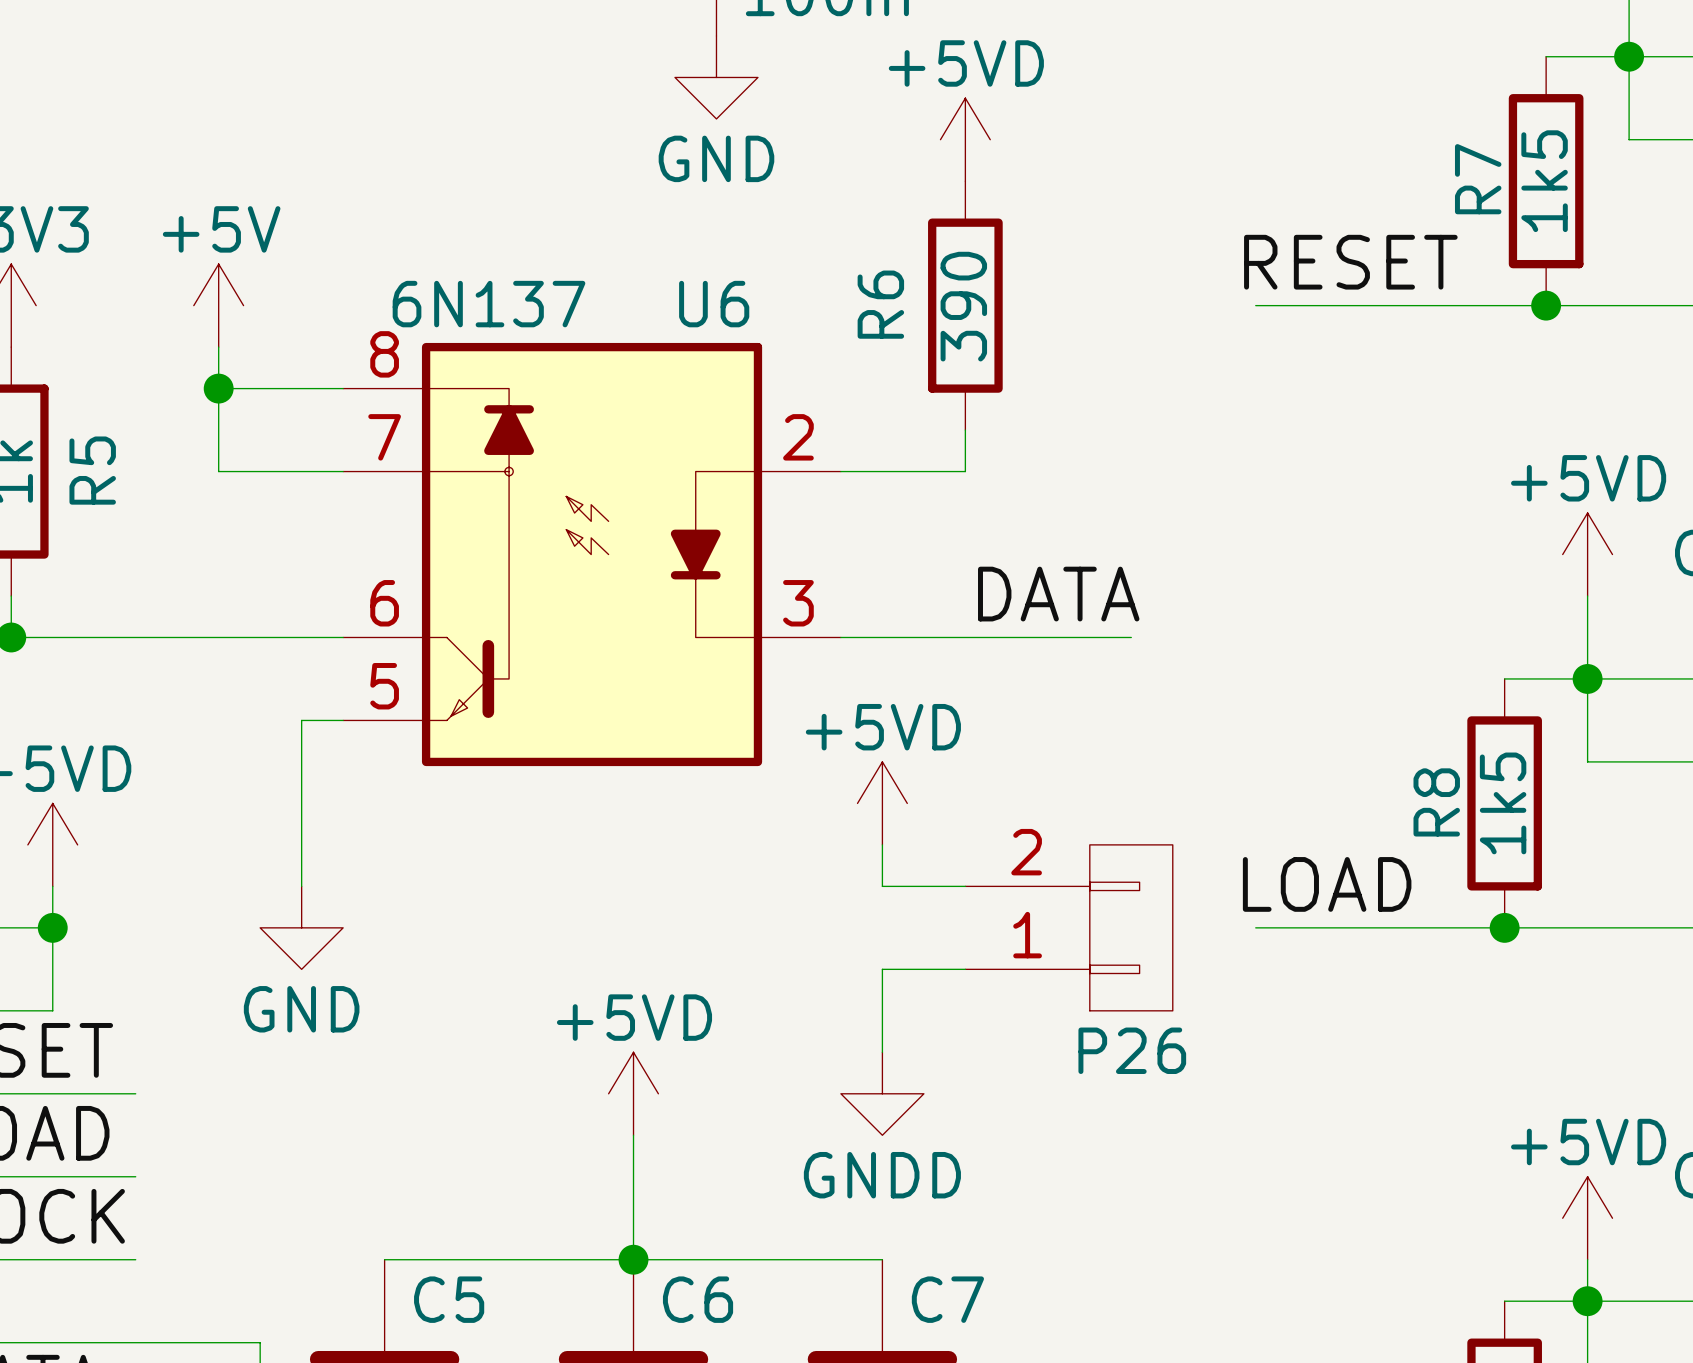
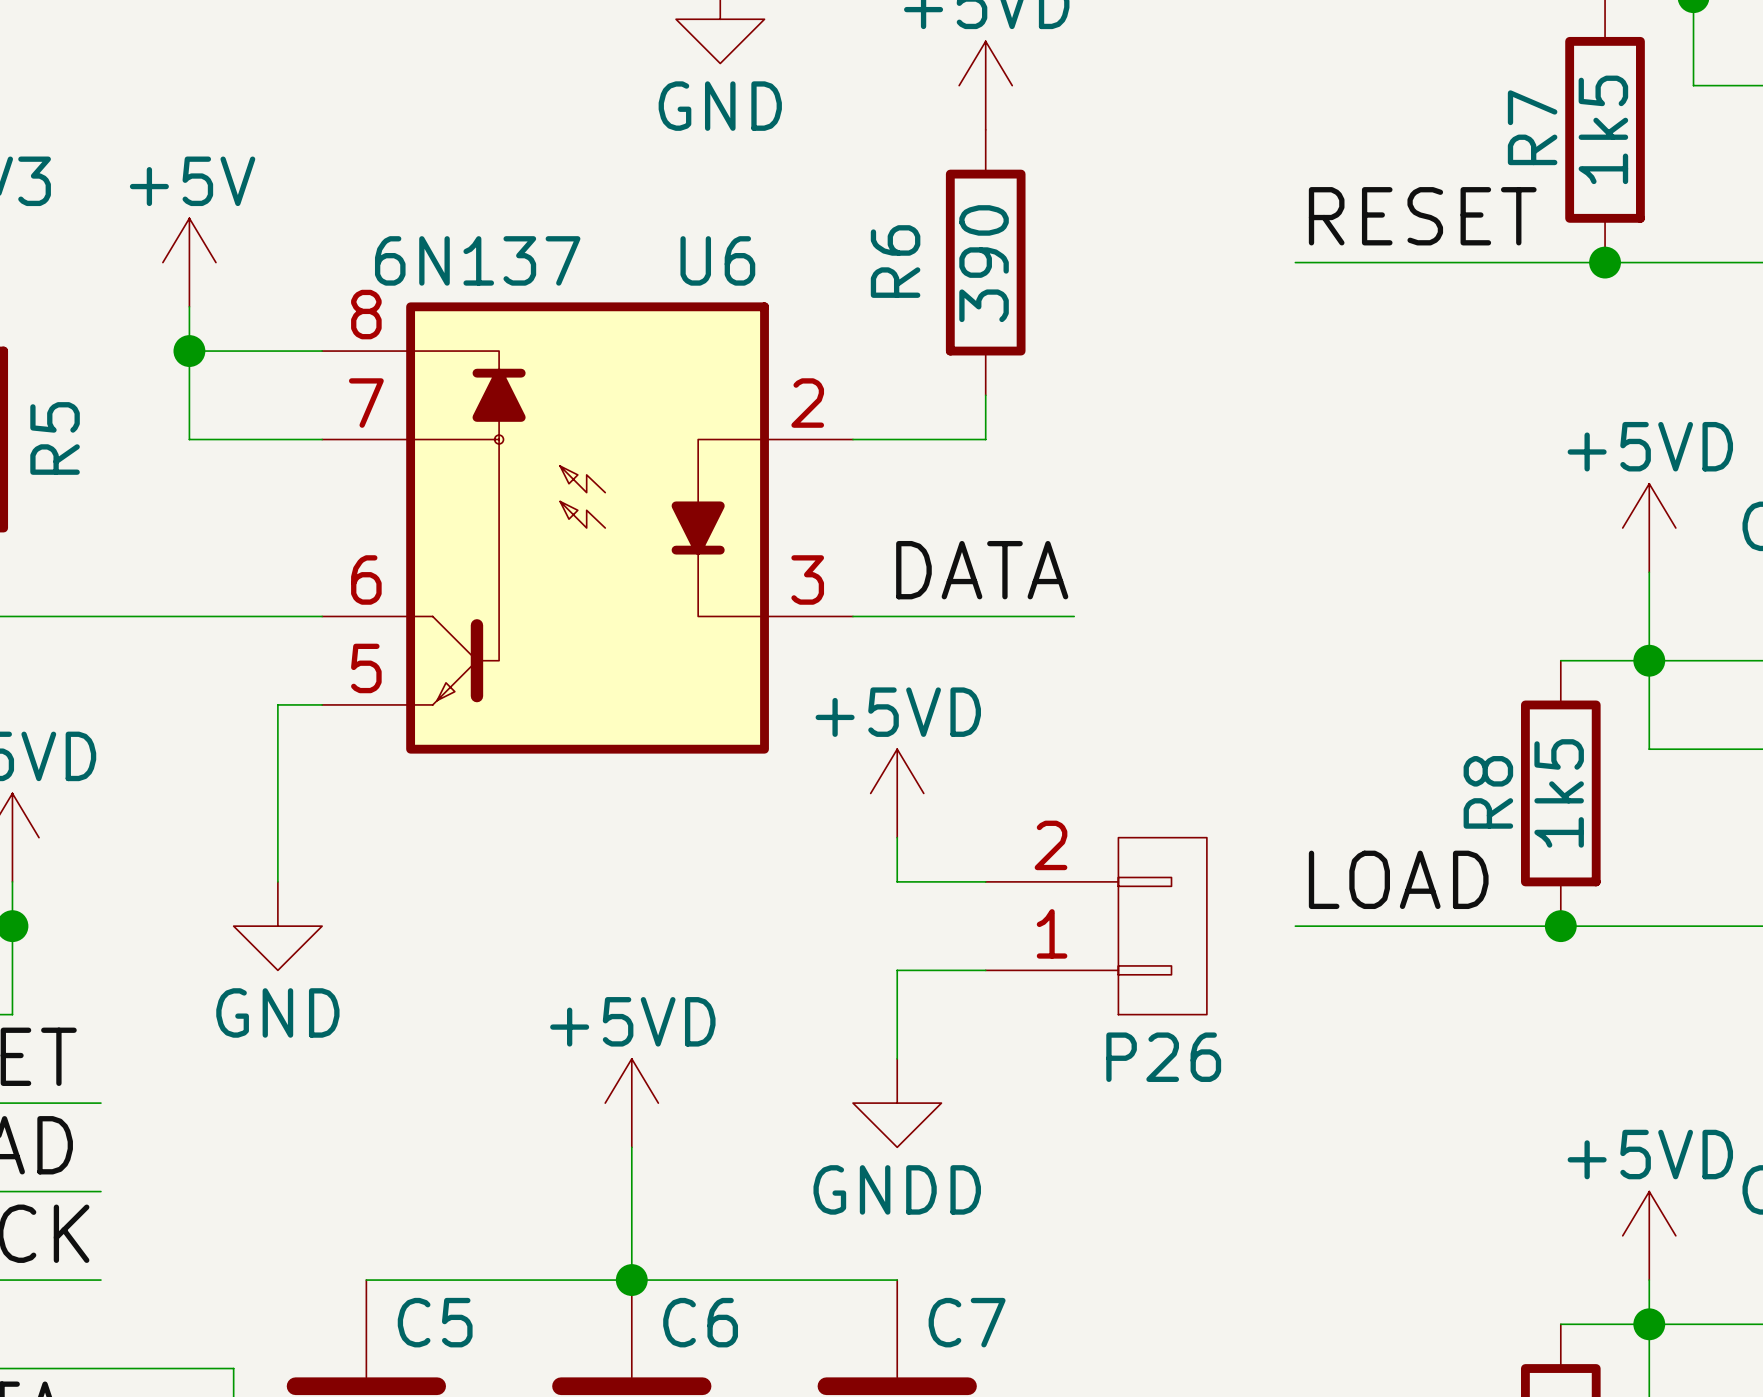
label position: RESET (1350, 262) -> RESET (1422, 216)
label position: DATA (1058, 594) -> DATA (982, 570)
wire: (1048, 637) (1131, 637) -> none
label position: LOAD (1327, 884) -> LOAD (1398, 879)

